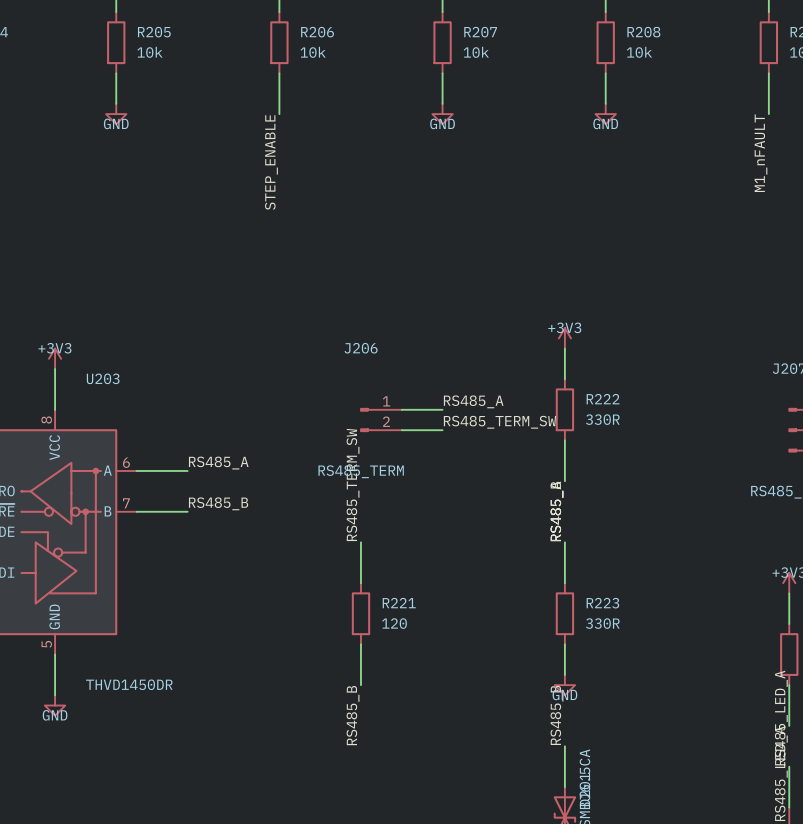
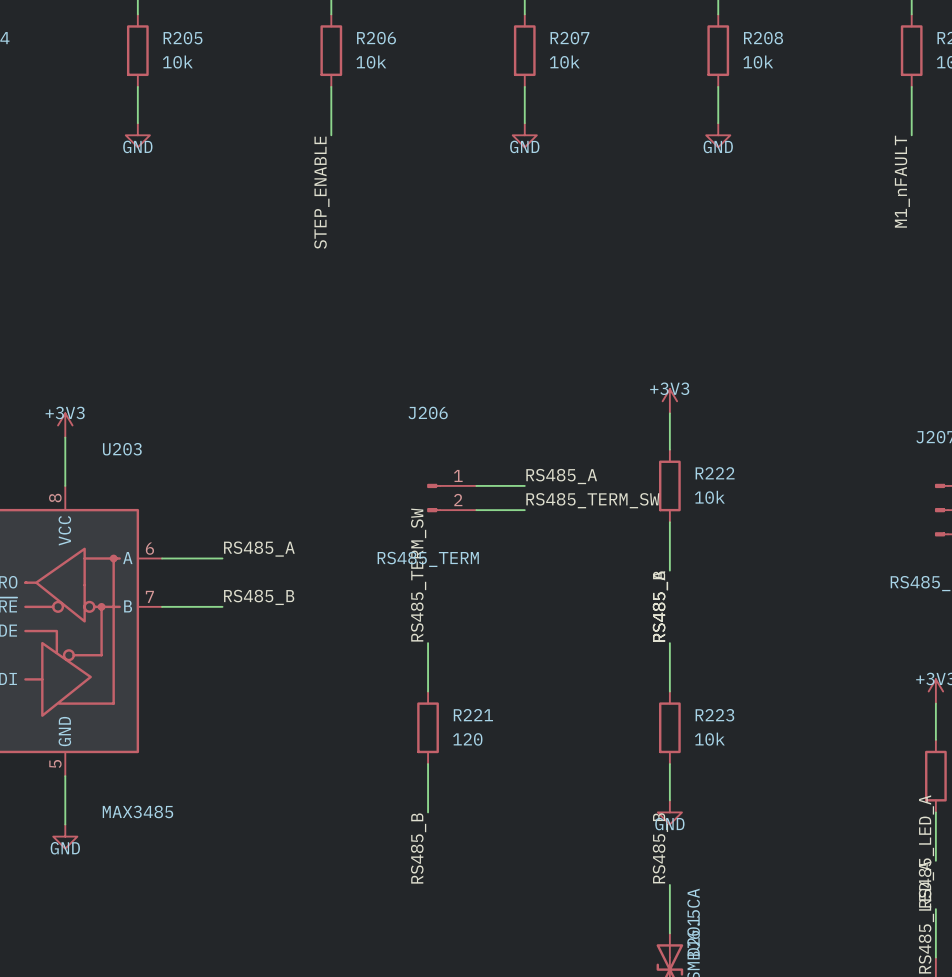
R222 value: 330R (602, 419) -> 10k (709, 497)
R223 value: 330R (602, 623) -> 10k (709, 739)
U203 value: THVD1450DR (129, 684) -> MAX3485 (137, 811)

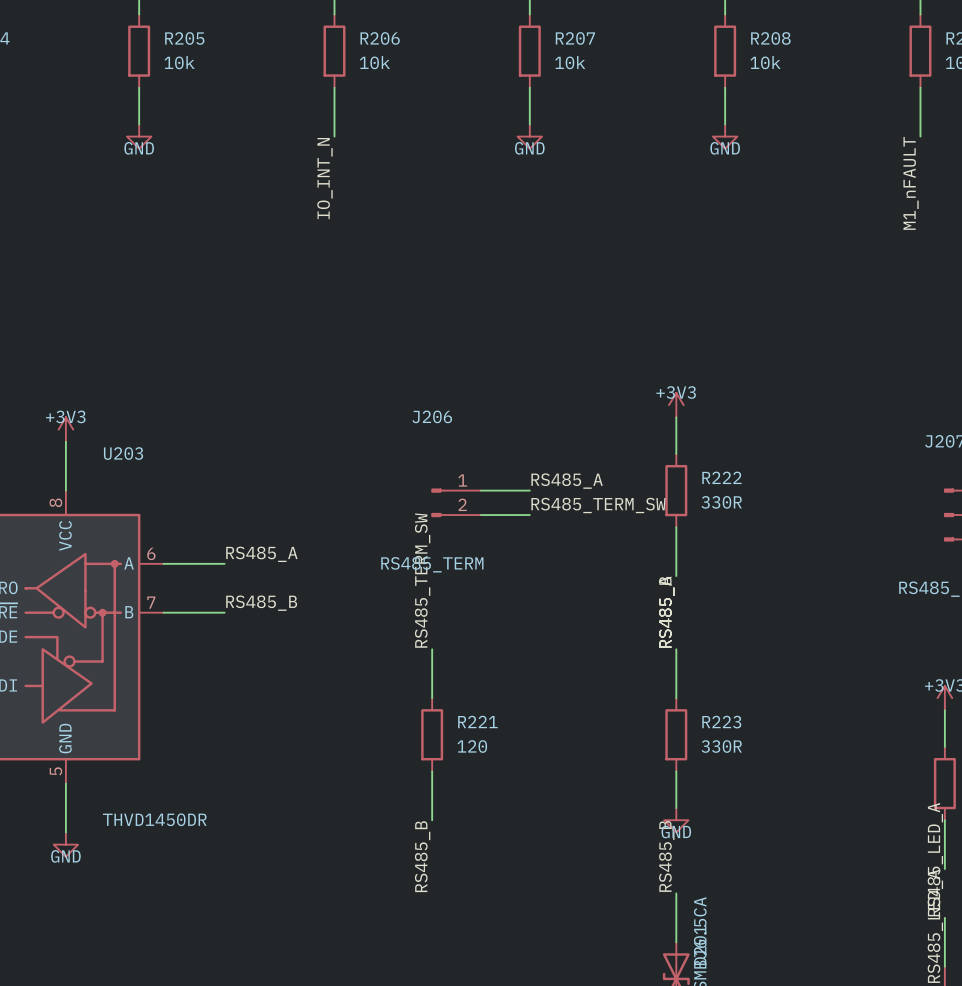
label: STEP_ENABLE (321, 192) -> IO_INT_N (324, 178)
R222 value: 10k (709, 497) -> 330R (721, 502)
R223 value: 10k (709, 739) -> 330R (721, 746)
U203 value: MAX3485 (137, 811) -> THVD1450DR (154, 819)

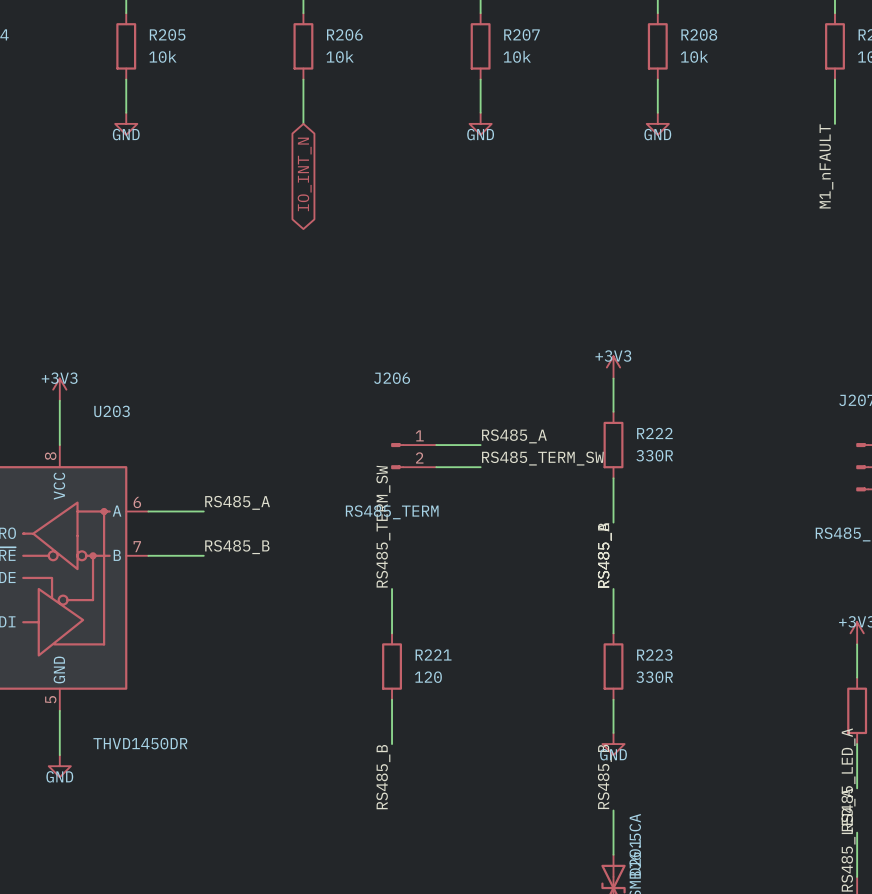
label: IO_INT_N (324, 178) -> none
global label: none -> IO_INT_N (304, 174)

